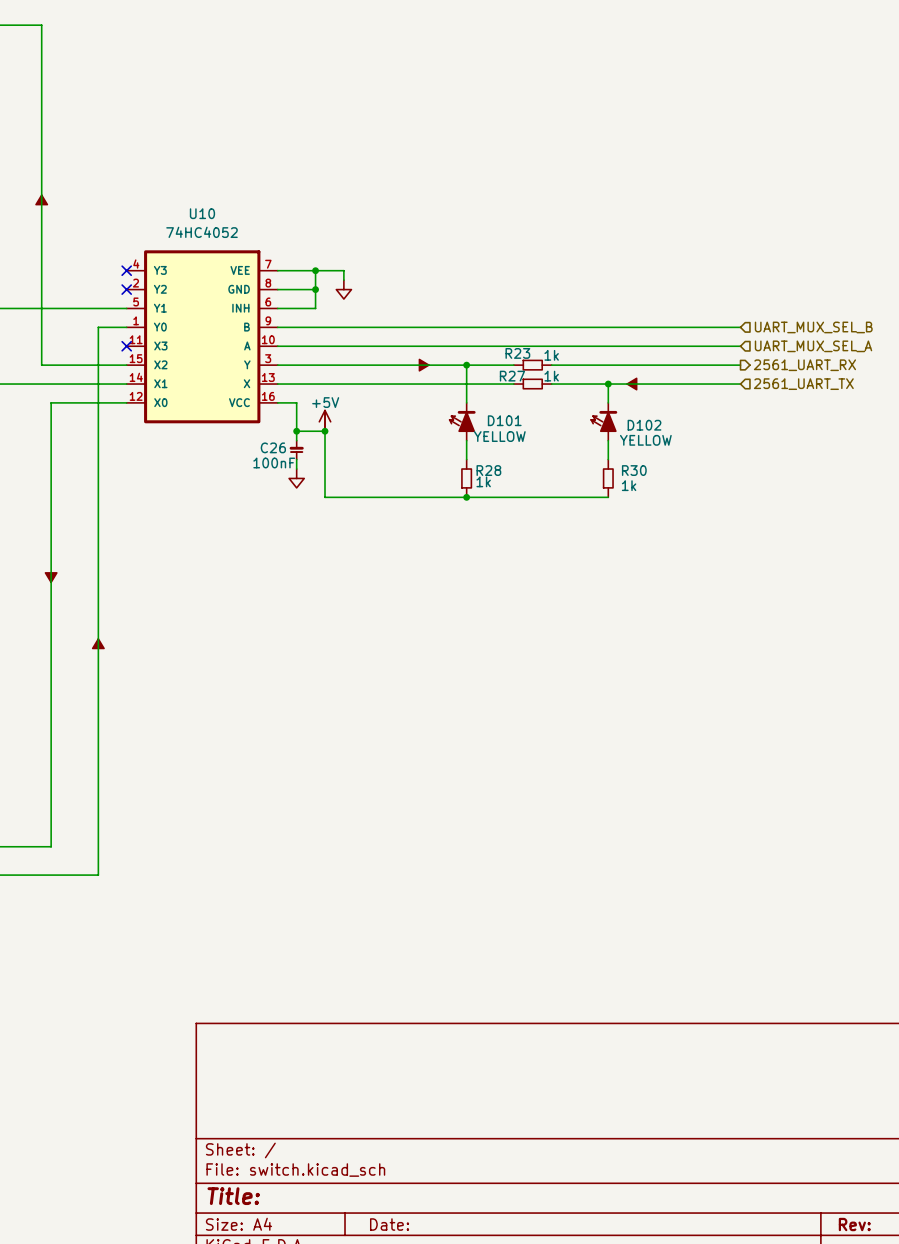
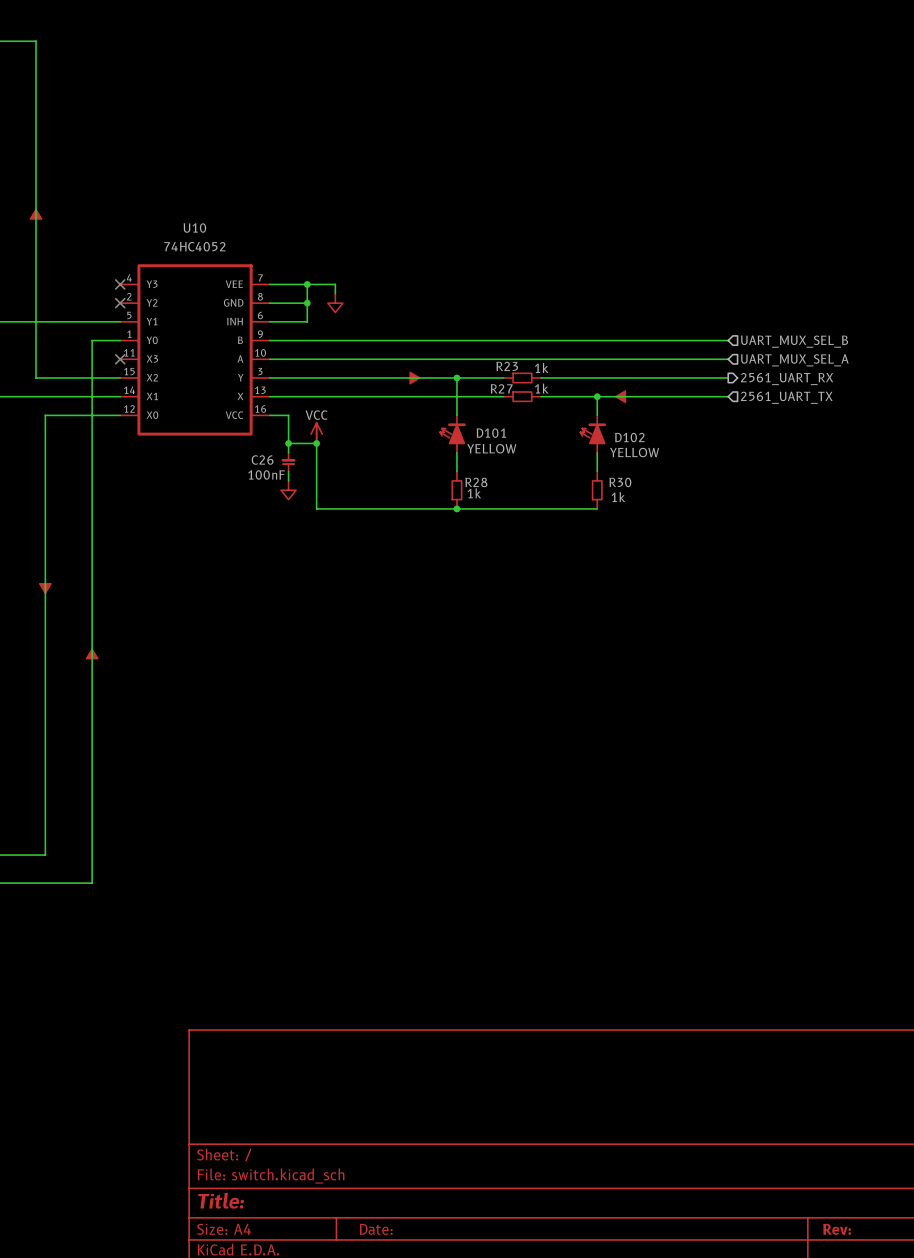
power symbol: +5V (325, 420) -> VCC (316, 433)

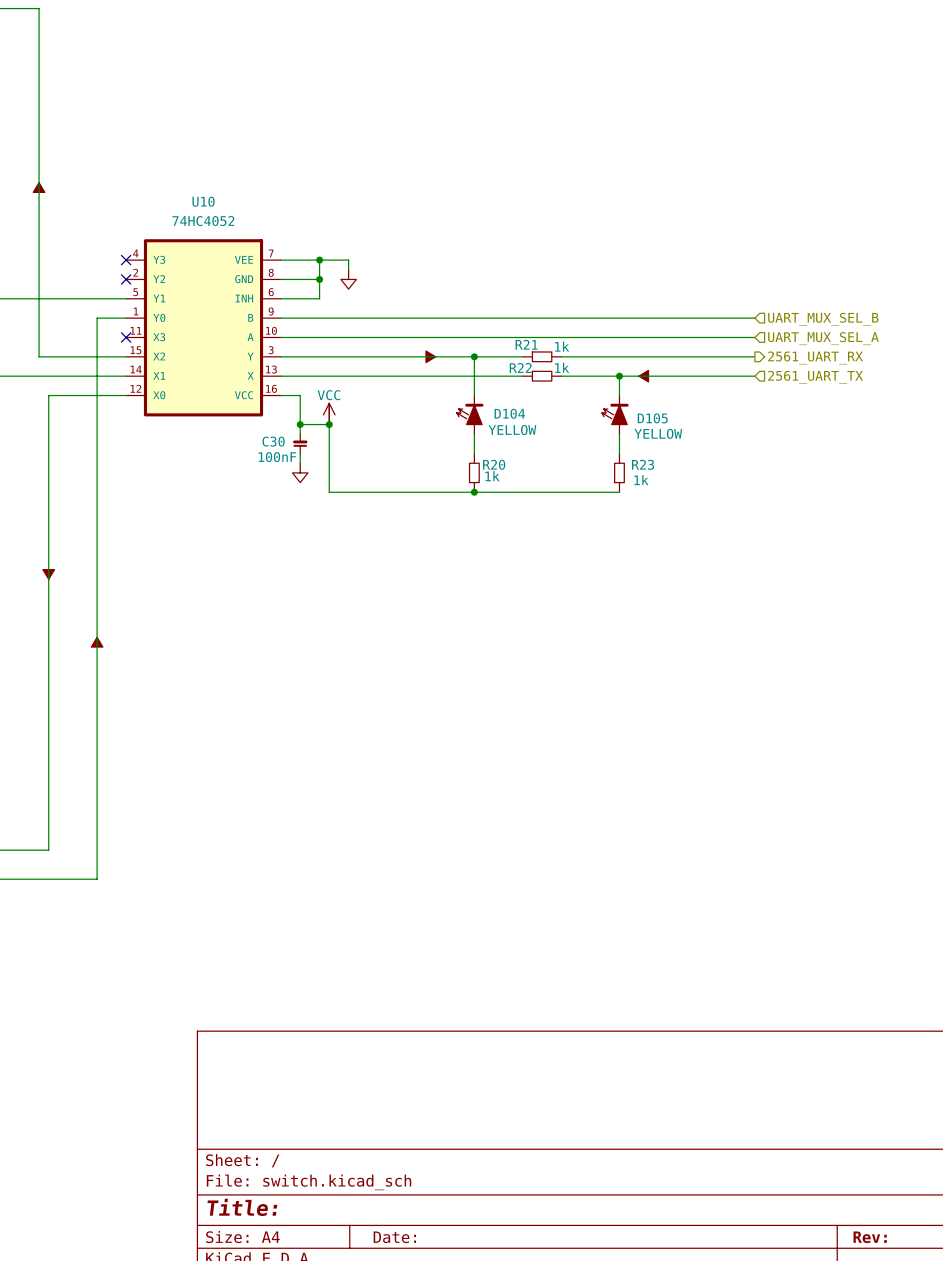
R23 name: R23 (507, 366) -> R21 (526, 344)
R27 name: R27 (501, 388) -> R22 (520, 367)
D101 name: D101 (491, 433) -> D104 (509, 413)
D102 name: D102 (629, 437) -> D105 (652, 418)
C26 name: C26 (262, 460) -> C30 (273, 441)
R28 name: R28 (476, 482) -> R20 (494, 464)
R30 name: R30 (620, 482) -> R23 (643, 464)

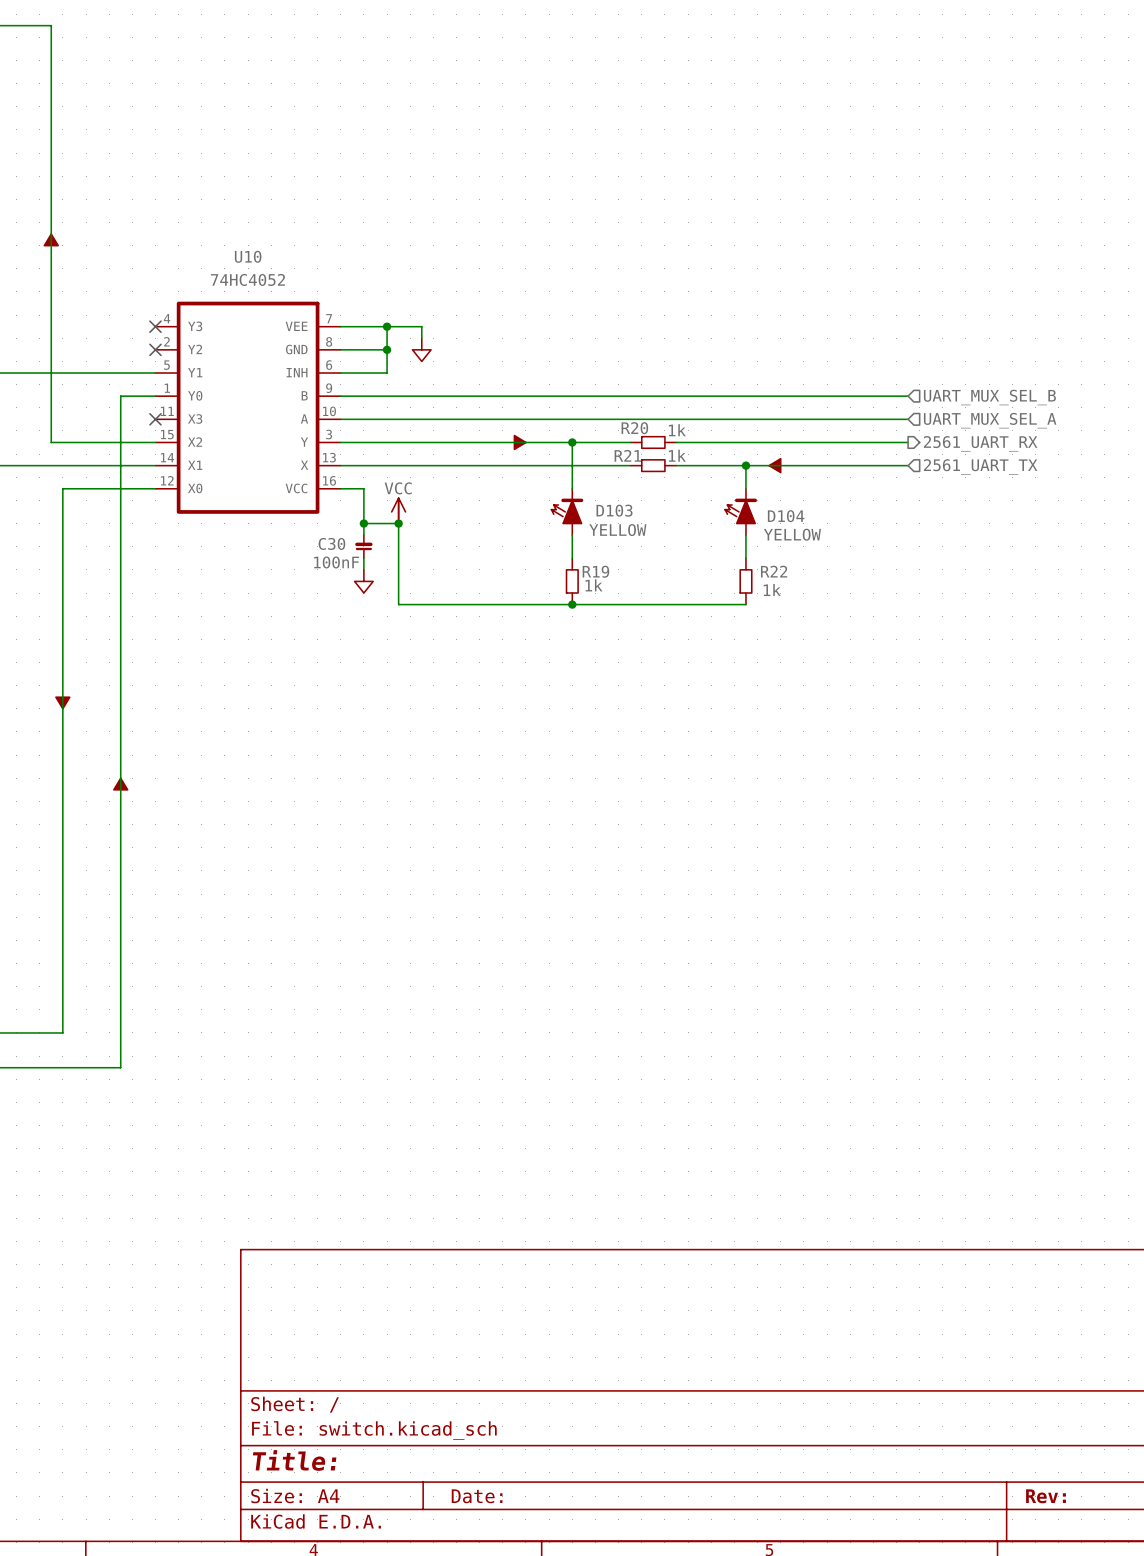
R21 name: R21 (526, 344) -> R20 (634, 428)
R22 name: R22 (520, 367) -> R21 (627, 455)
D104 name: D104 (509, 413) -> D103 (614, 510)
D105 name: D105 (652, 418) -> D104 (786, 516)
R20 name: R20 (494, 464) -> R19 (595, 571)
R23 name: R23 (643, 464) -> R22 (774, 571)

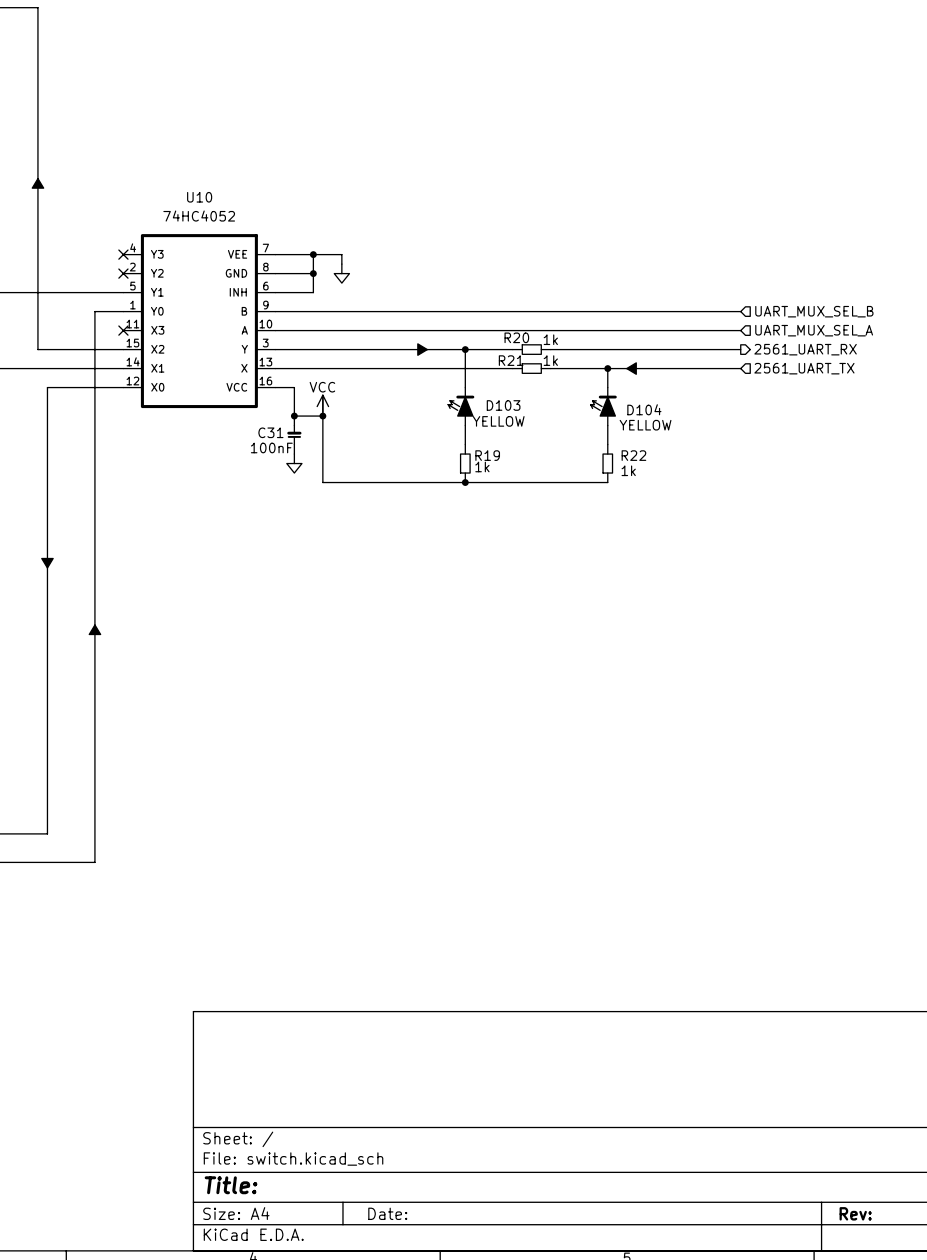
C30 name: C30 (331, 543) -> C31 (270, 432)

